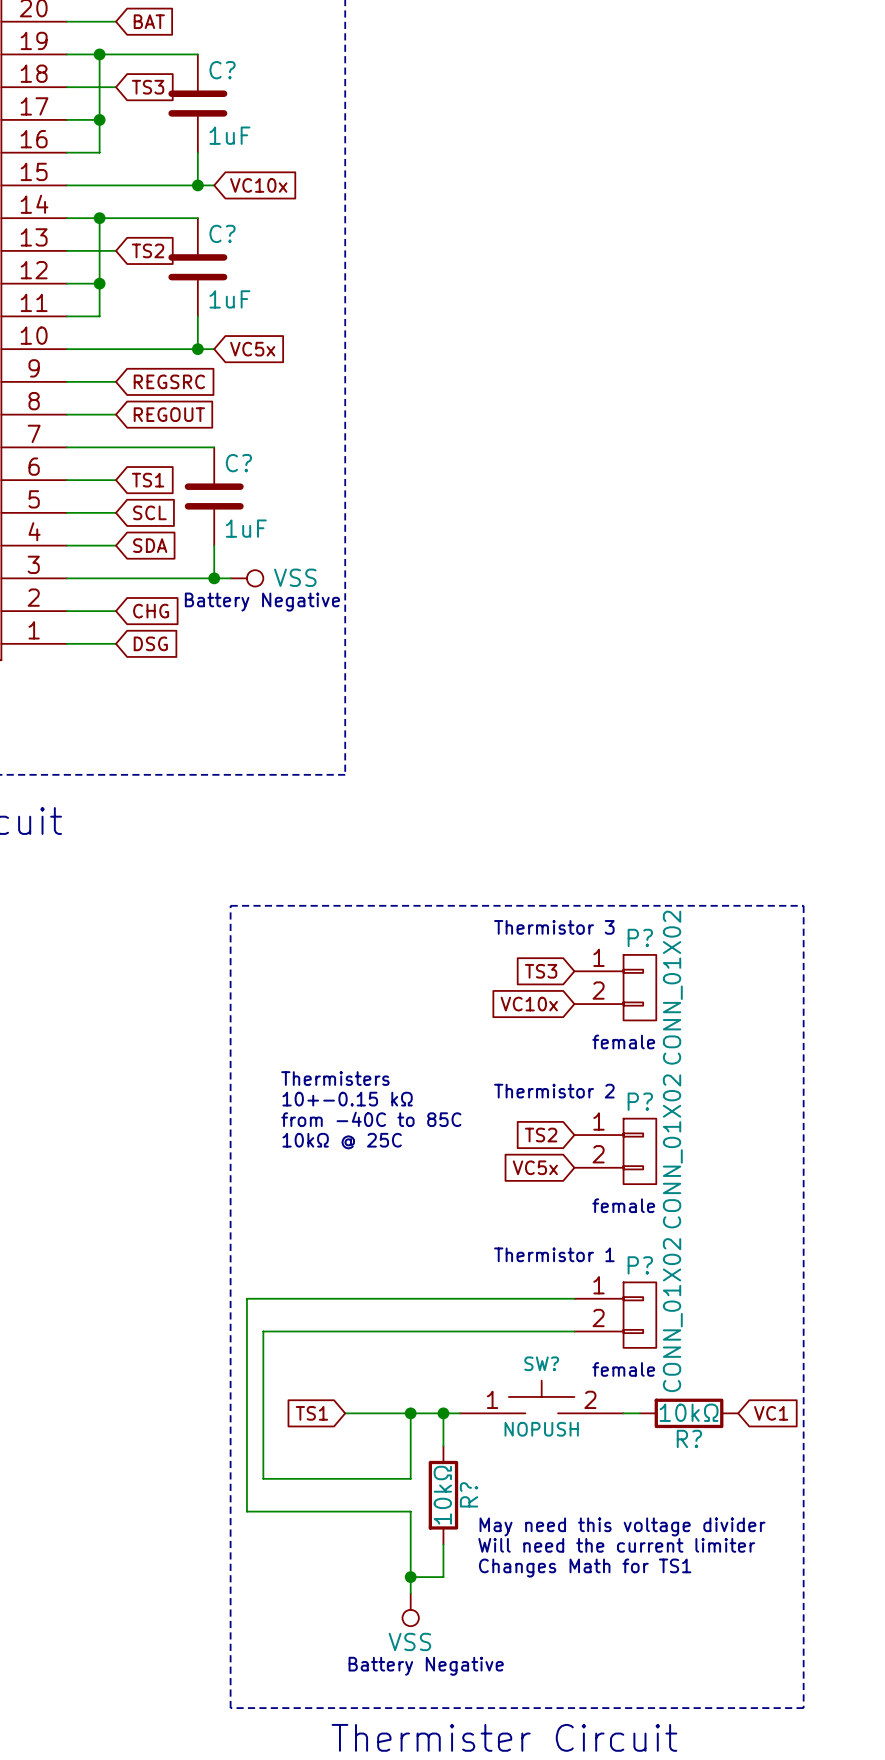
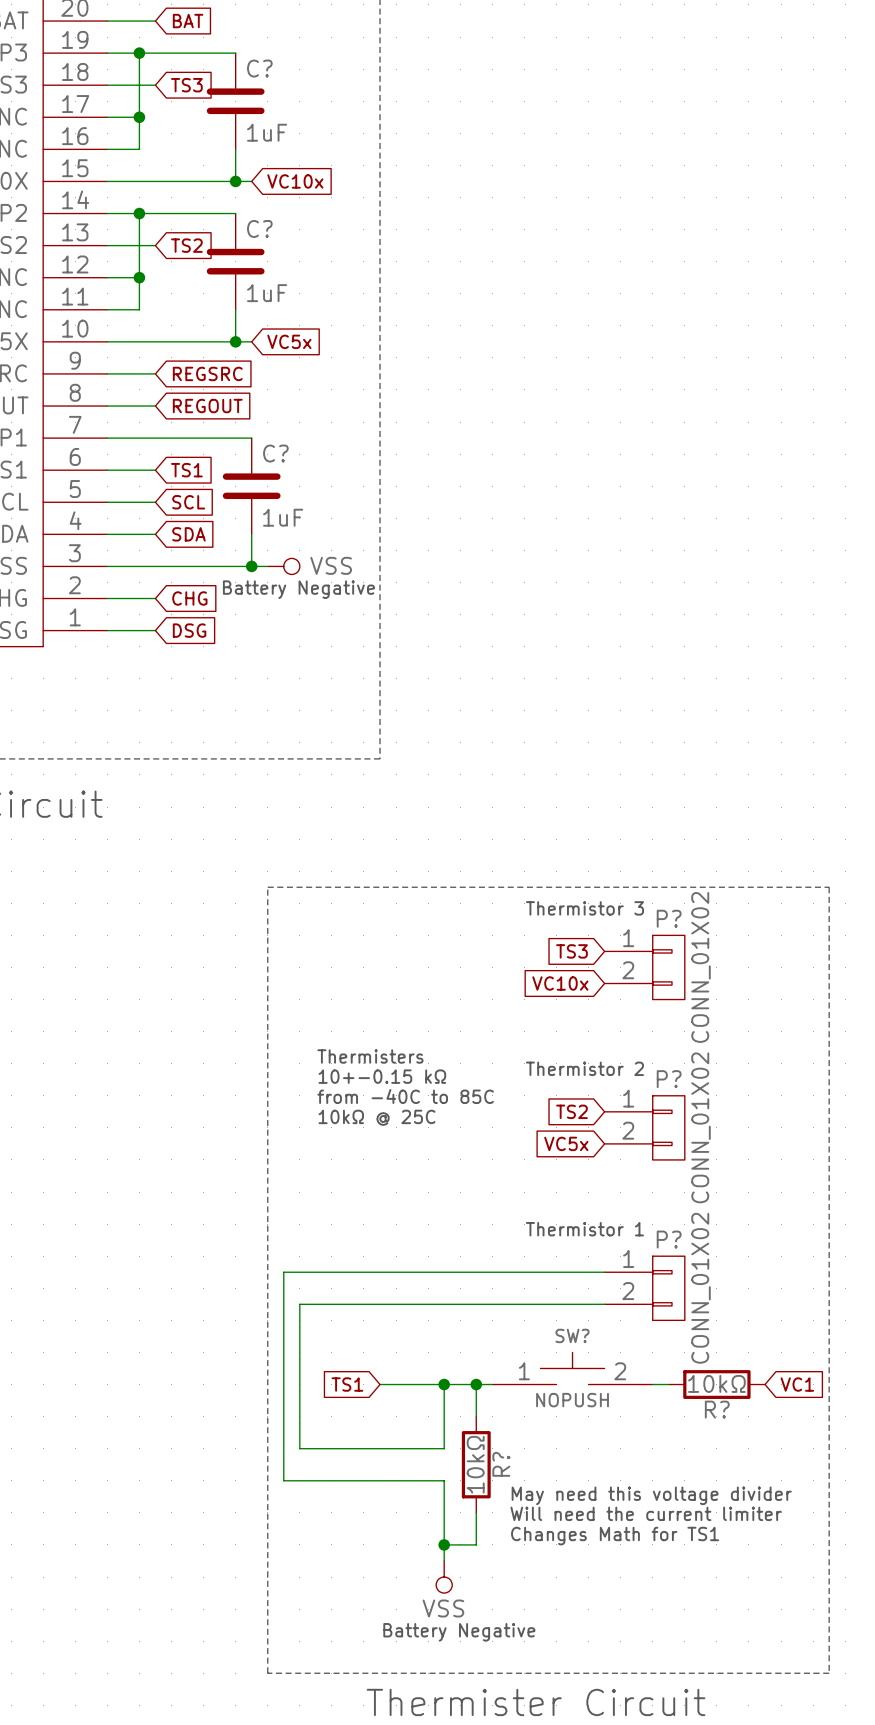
text: female (623, 1041) -> none
text: female (623, 1205) -> none
text: female (623, 1369) -> none

